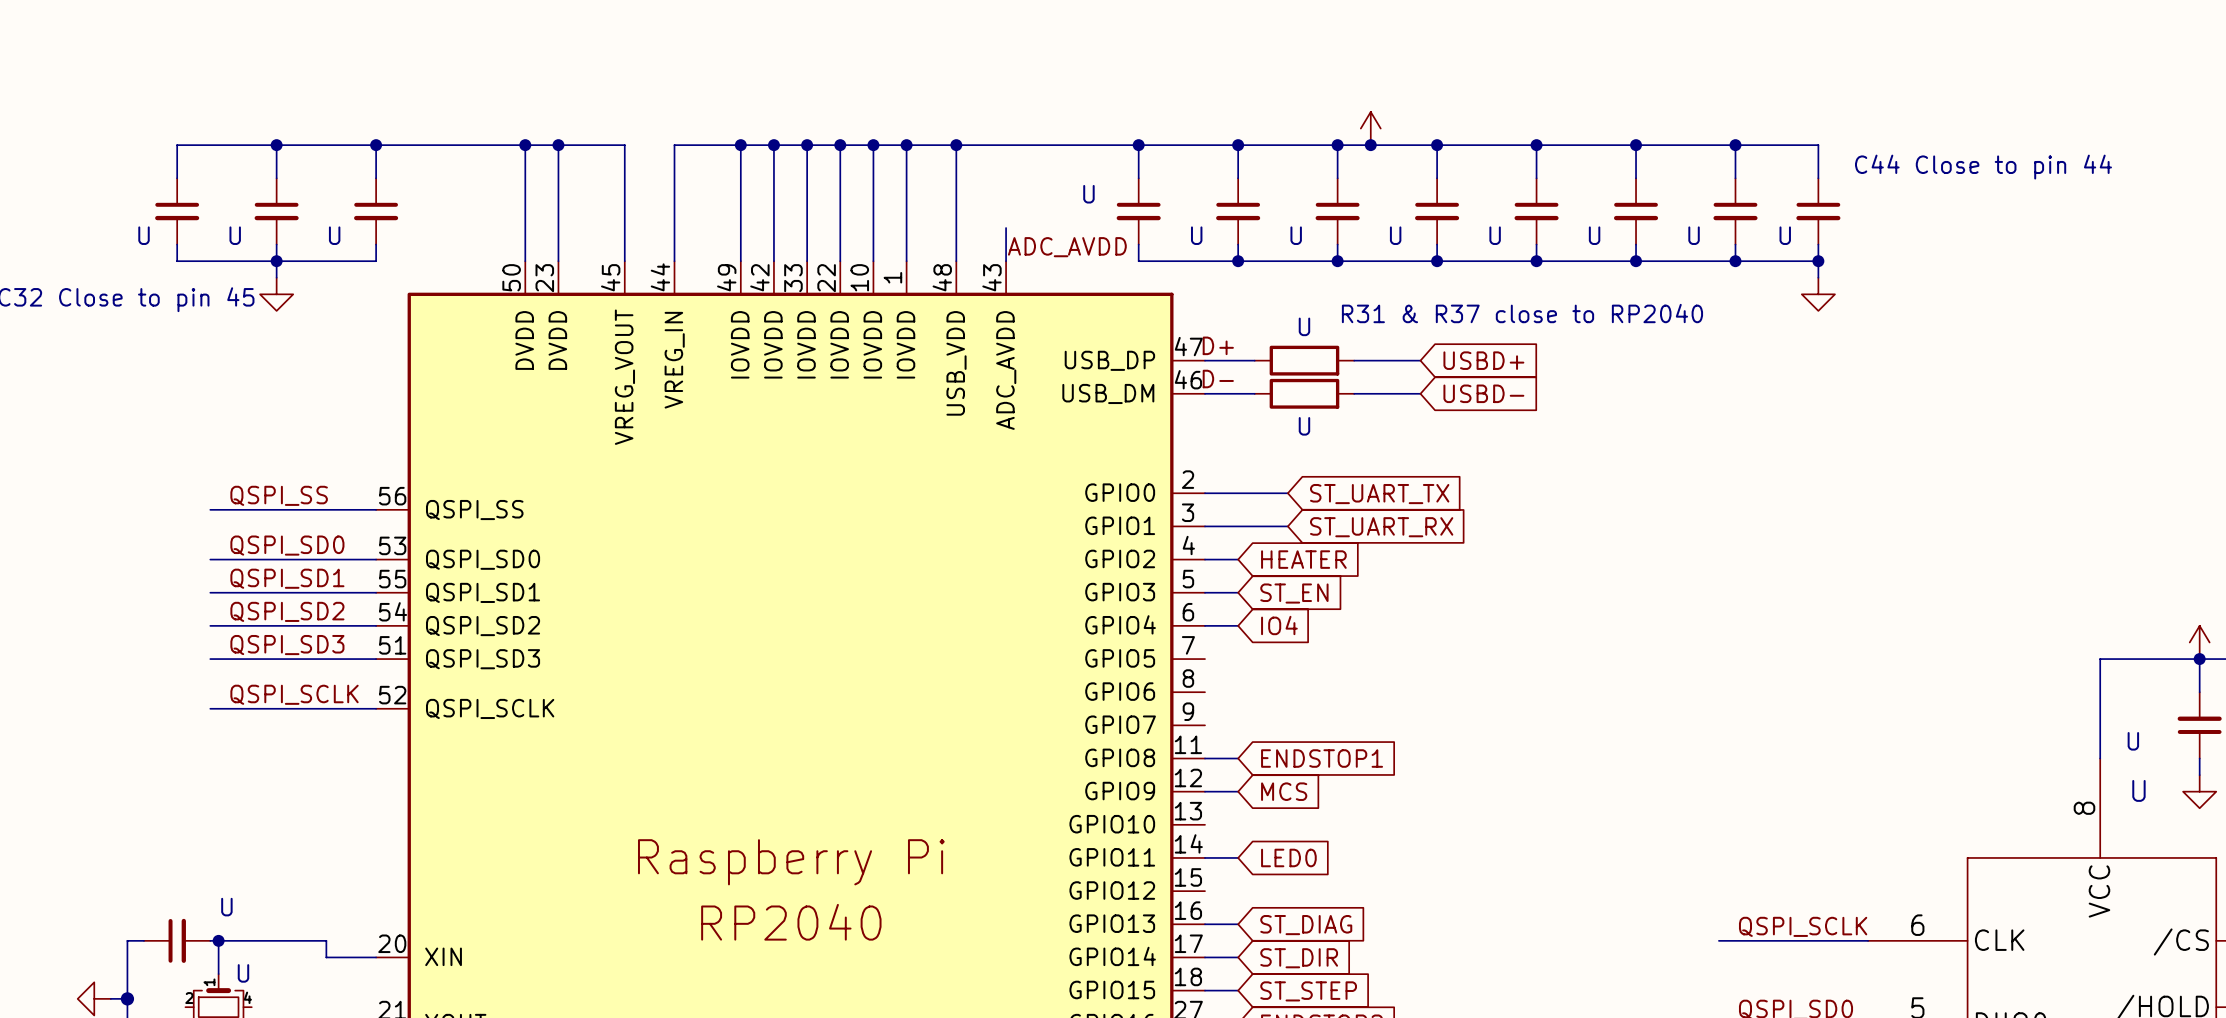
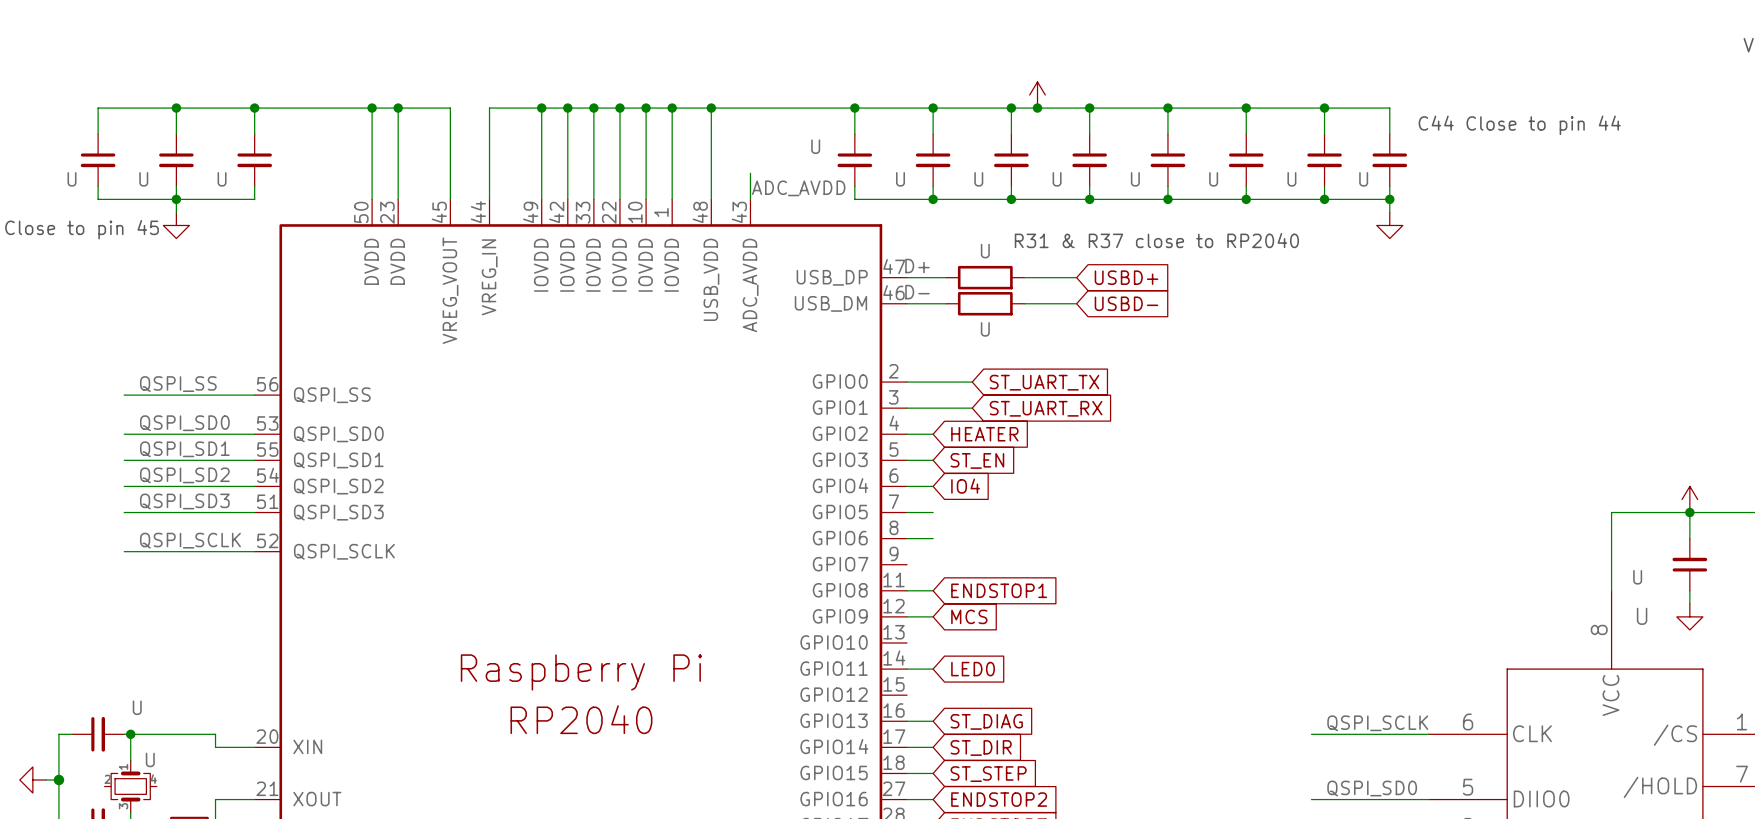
wire: none -> (907, 512) (933, 512)
wire: none -> (907, 538) (933, 538)

